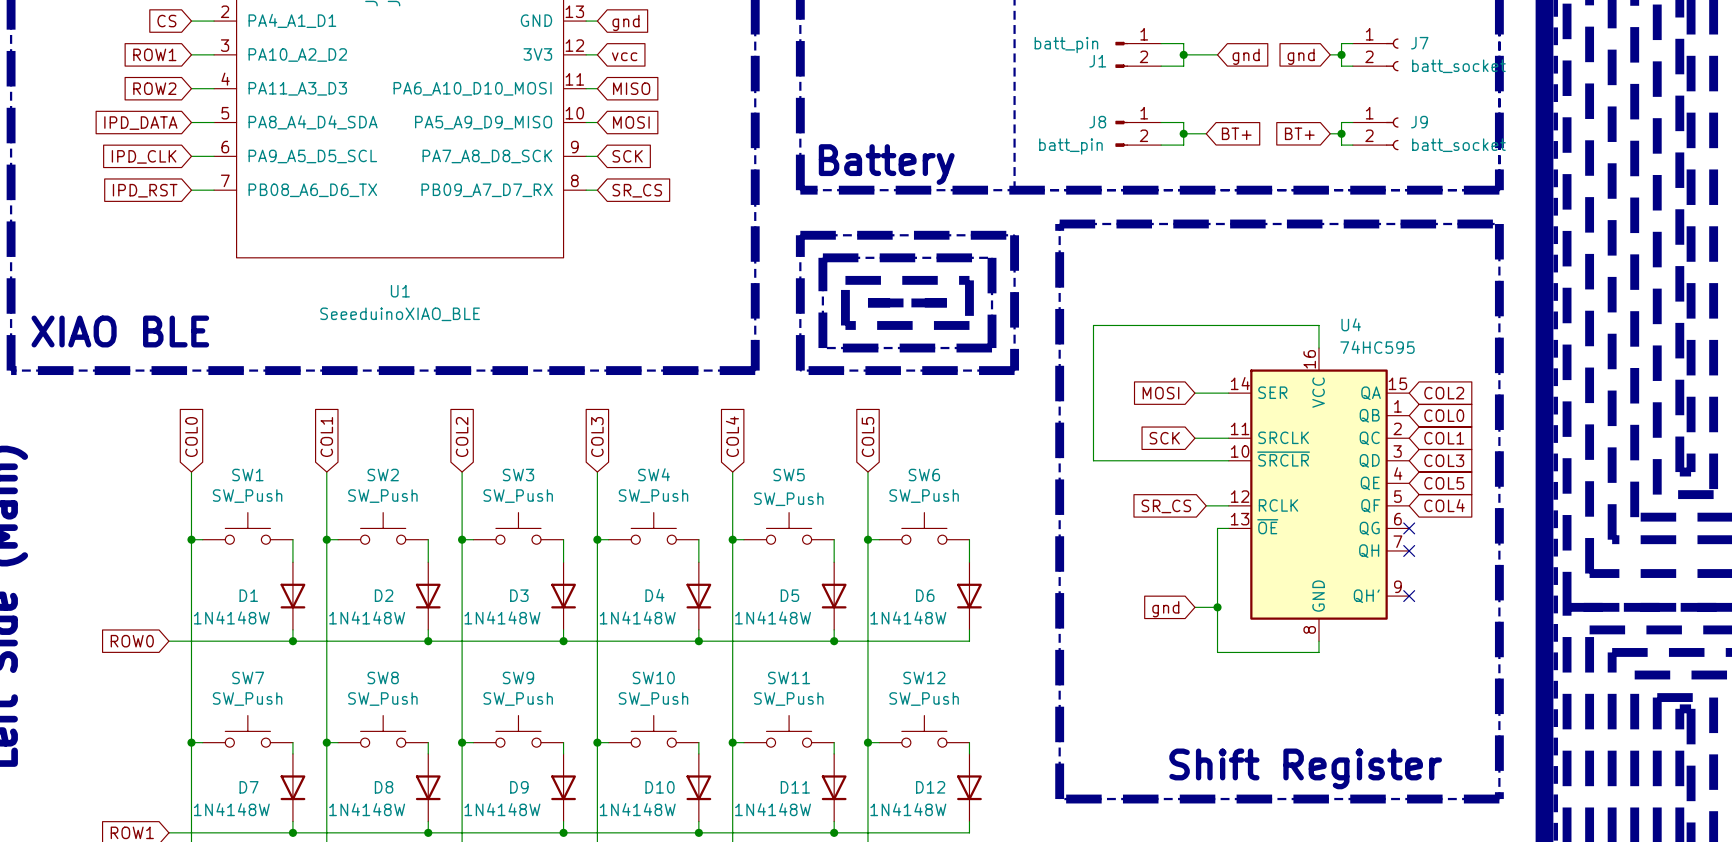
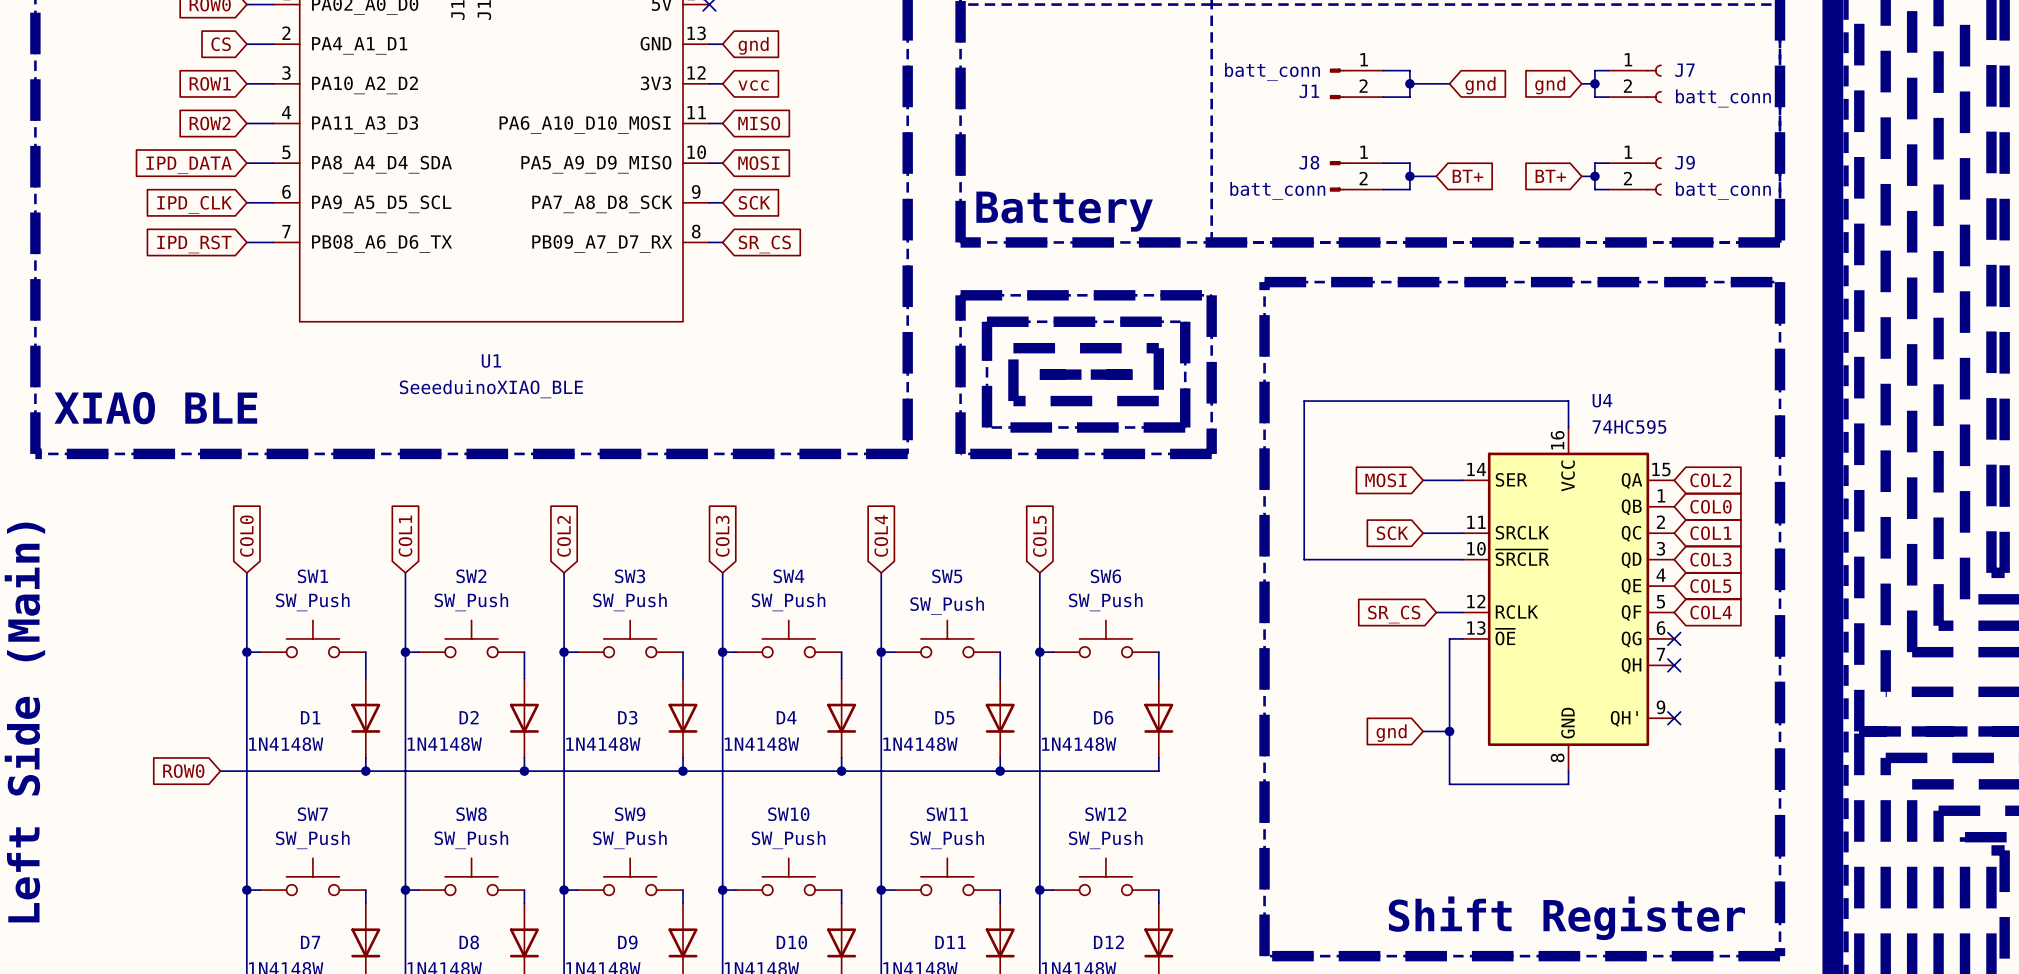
J1 value: batt_pin (1066, 45) -> batt_conn (1272, 72)
J7 value: batt_socket (1458, 66) -> batt_conn (1723, 98)
J9 value: batt_socket (1458, 145) -> batt_conn (1723, 190)
J8 value: batt_pin (1070, 146) -> batt_conn (1277, 190)

